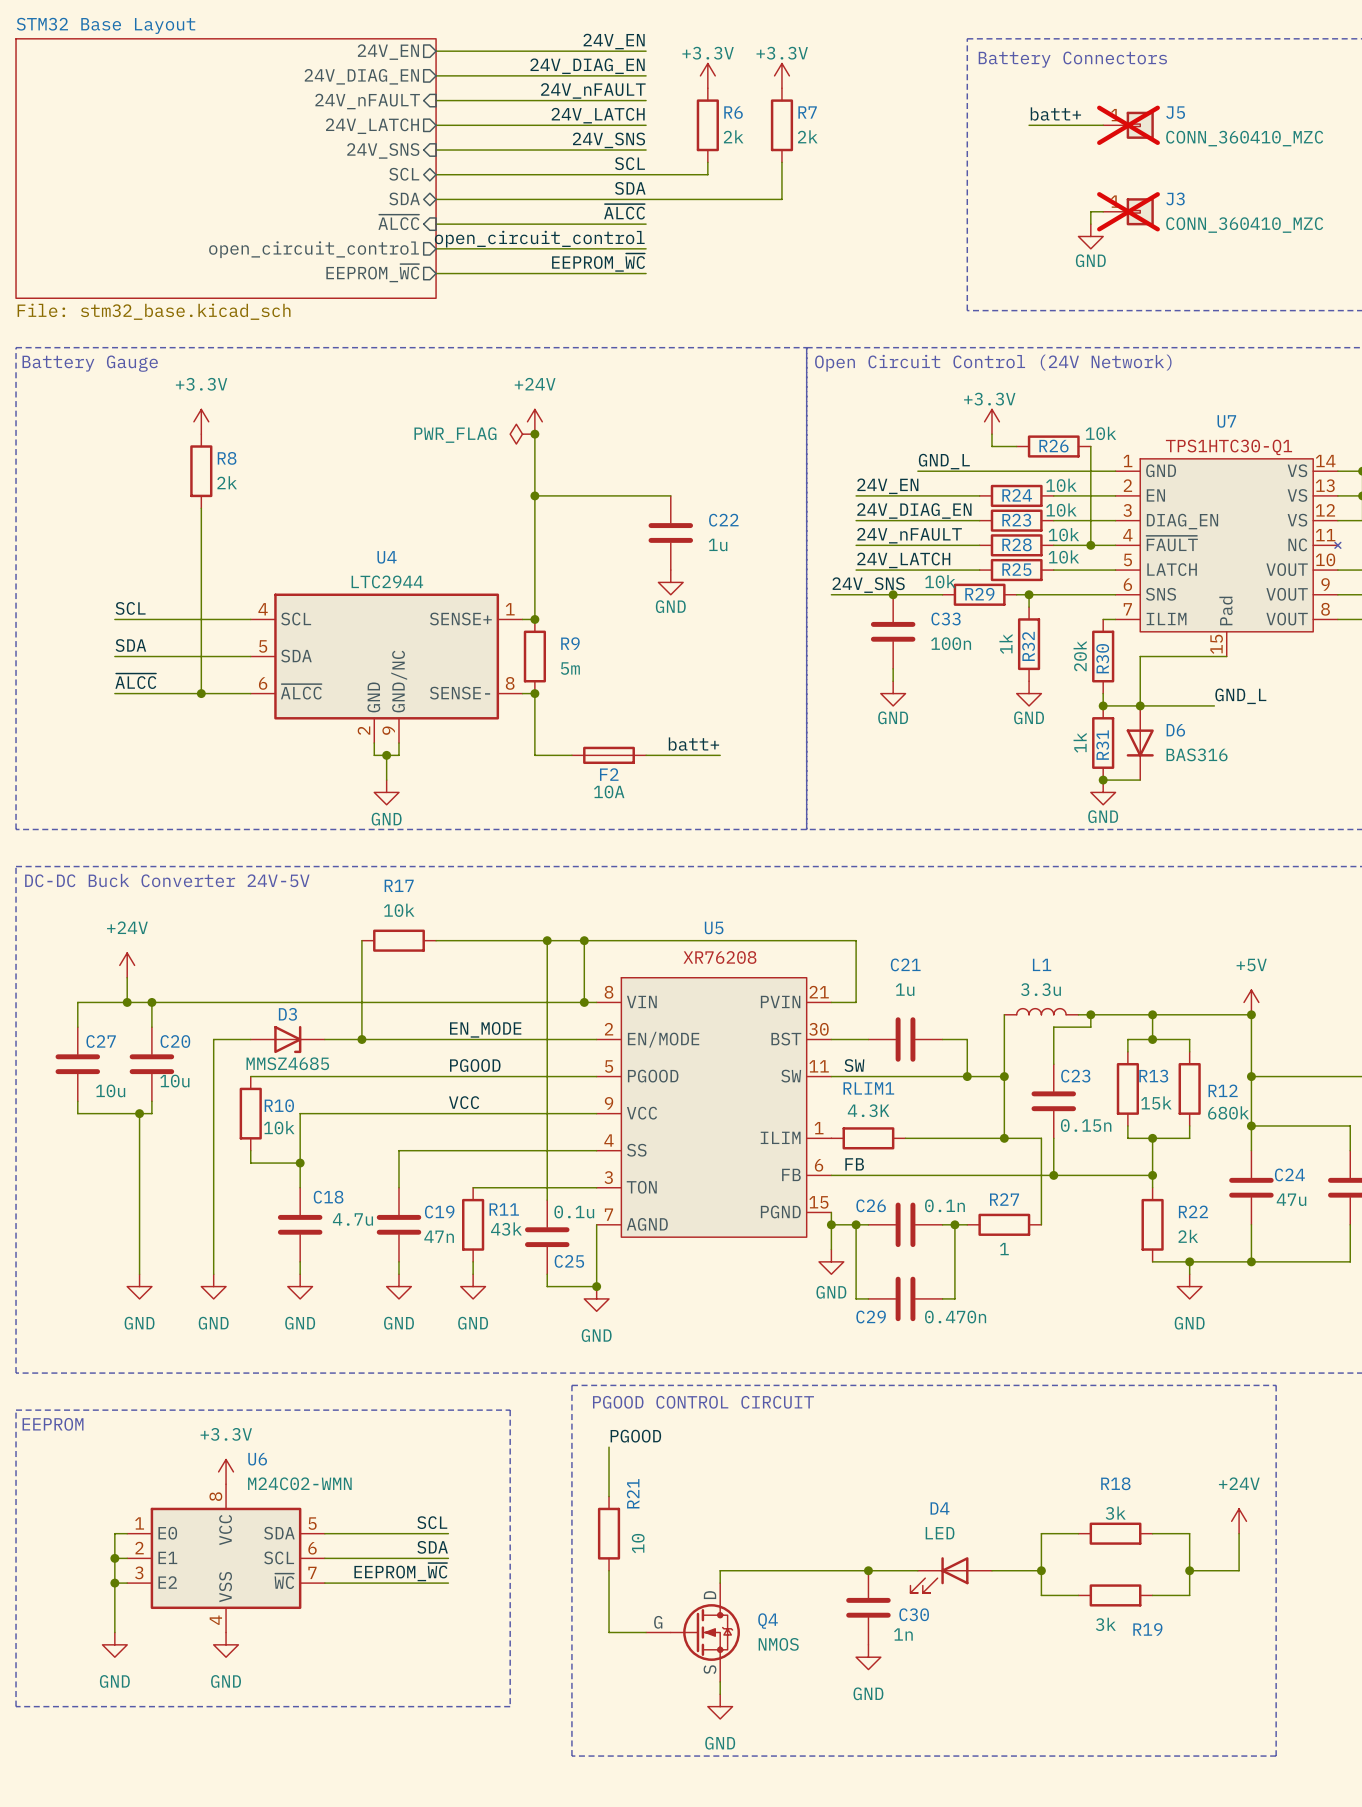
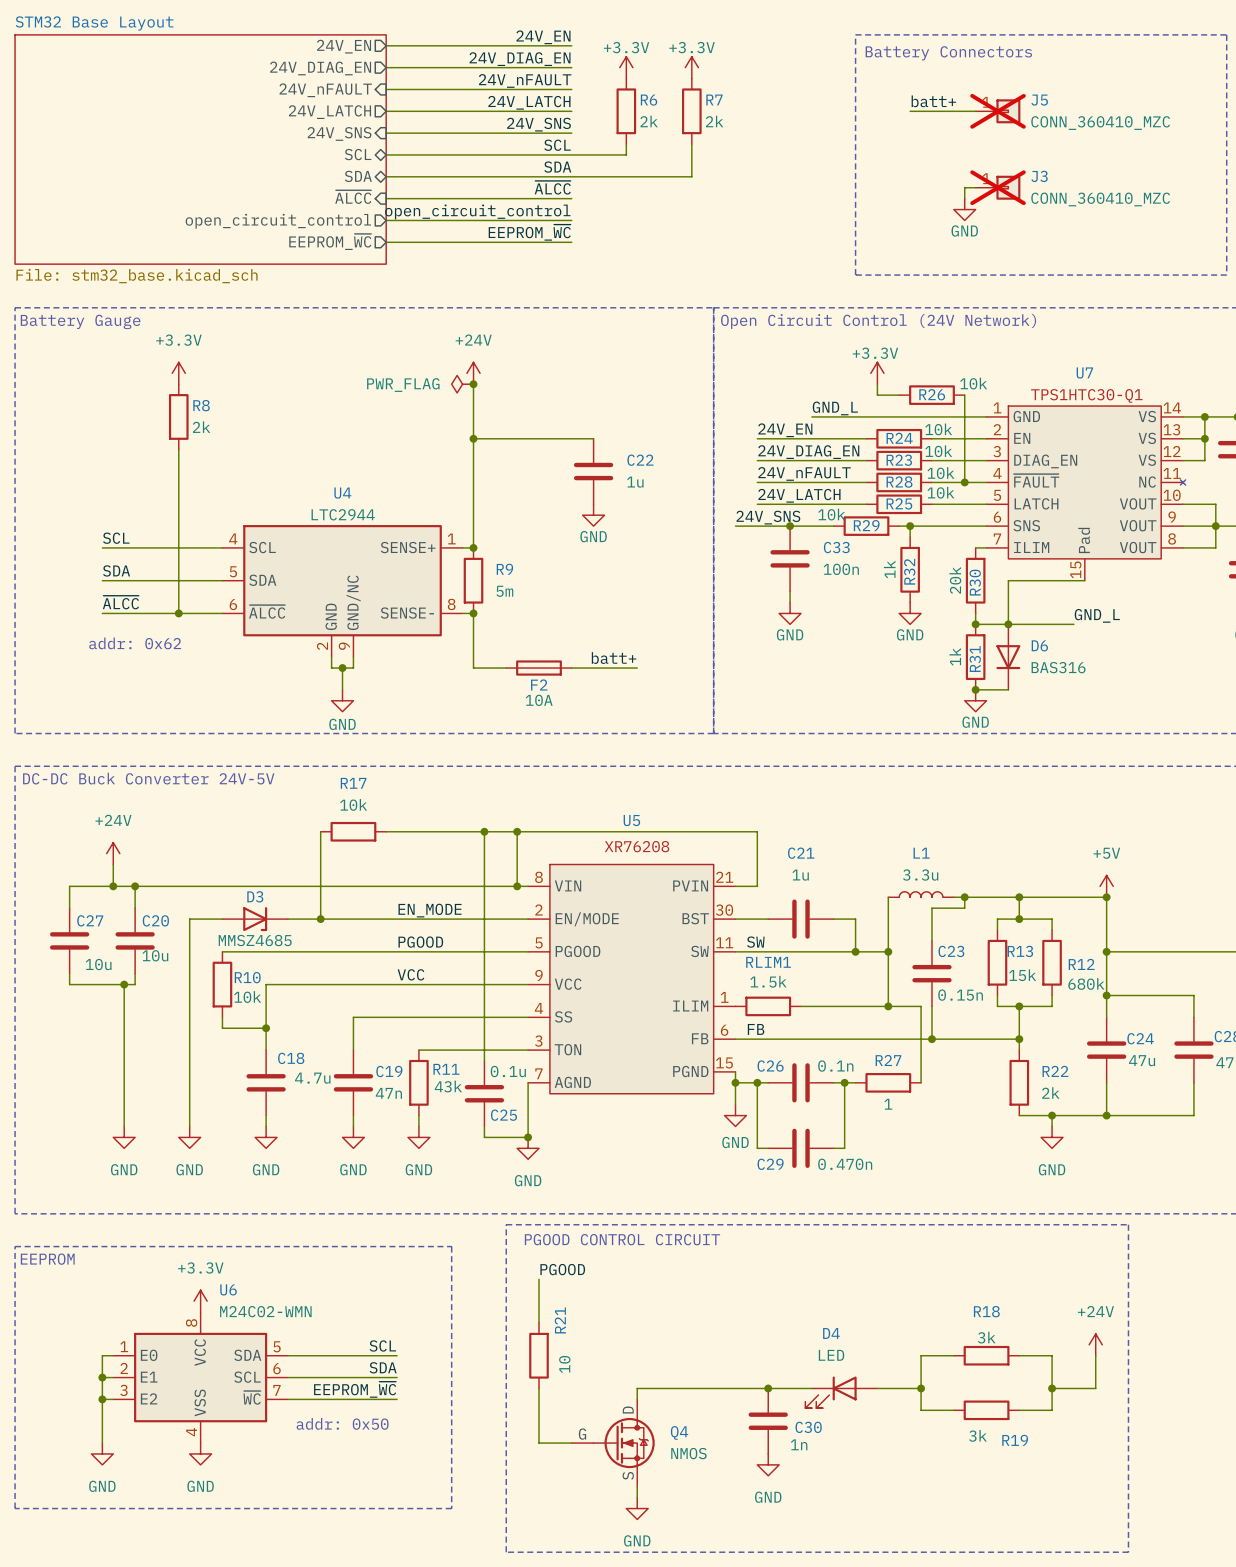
text: none -> addr: 0x62 (135, 643)
RLIM1 value: 4.3K (868, 1110) -> 1.5k (768, 981)
text: none -> addr: 0x50 (342, 1423)

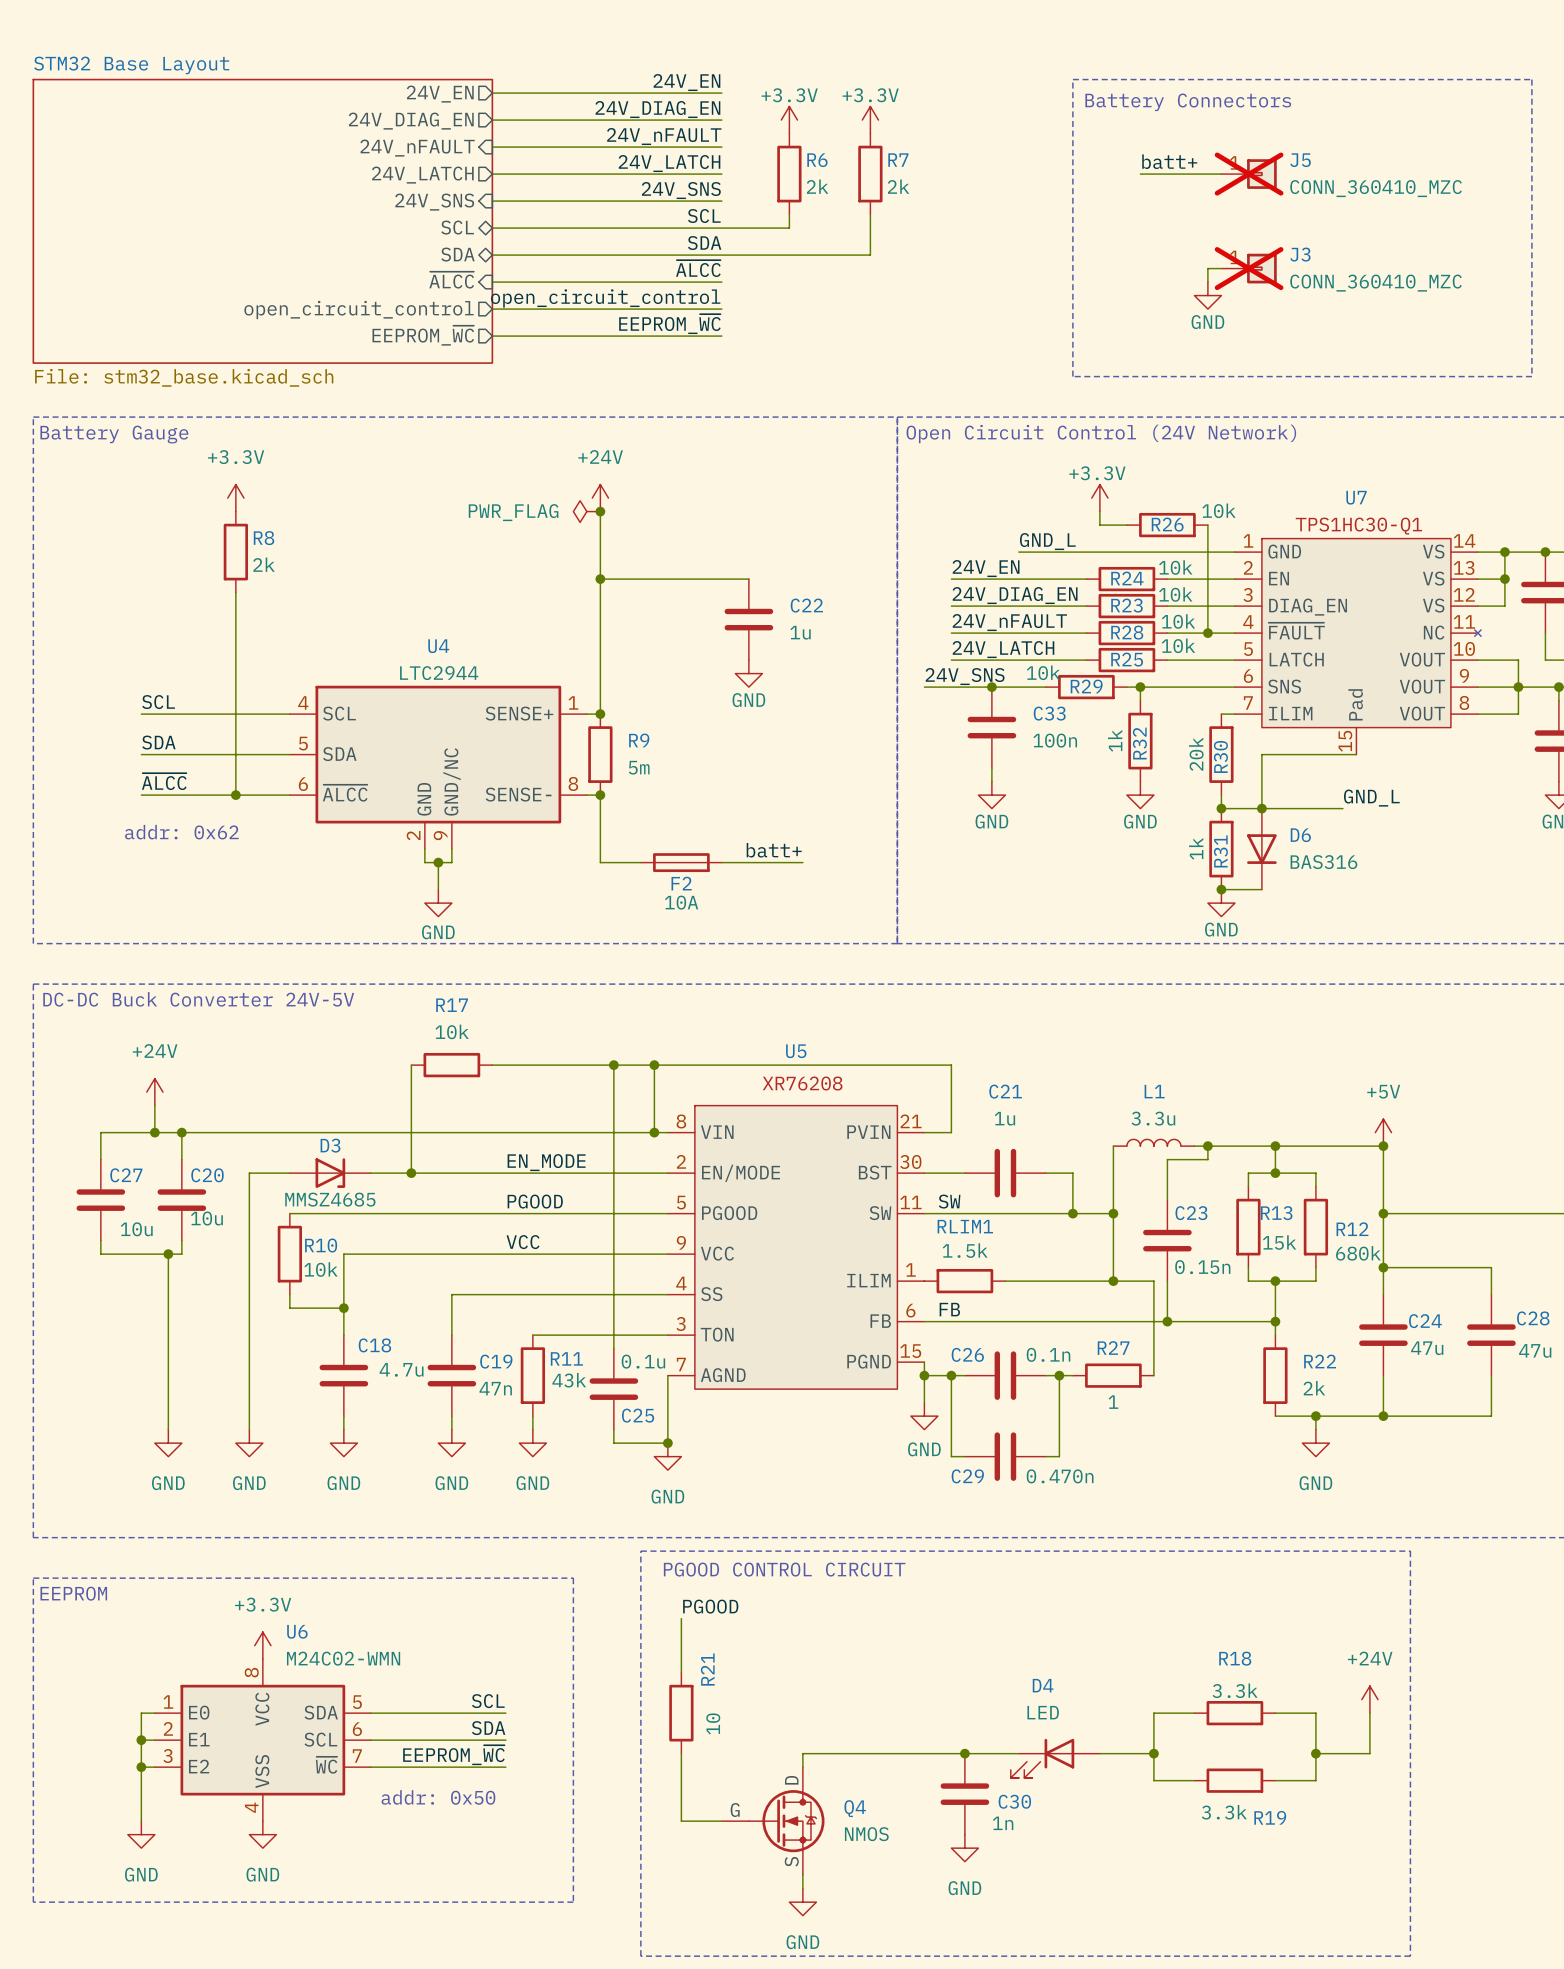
U7 text: TPS1HTC30-Q1 (1086, 395) -> TPS1HC30-Q1 (1358, 526)
R18 value: 3k (986, 1337) -> 3.3k (1235, 1690)
R19 value: 3k (978, 1435) -> 3.3k (1224, 1812)

